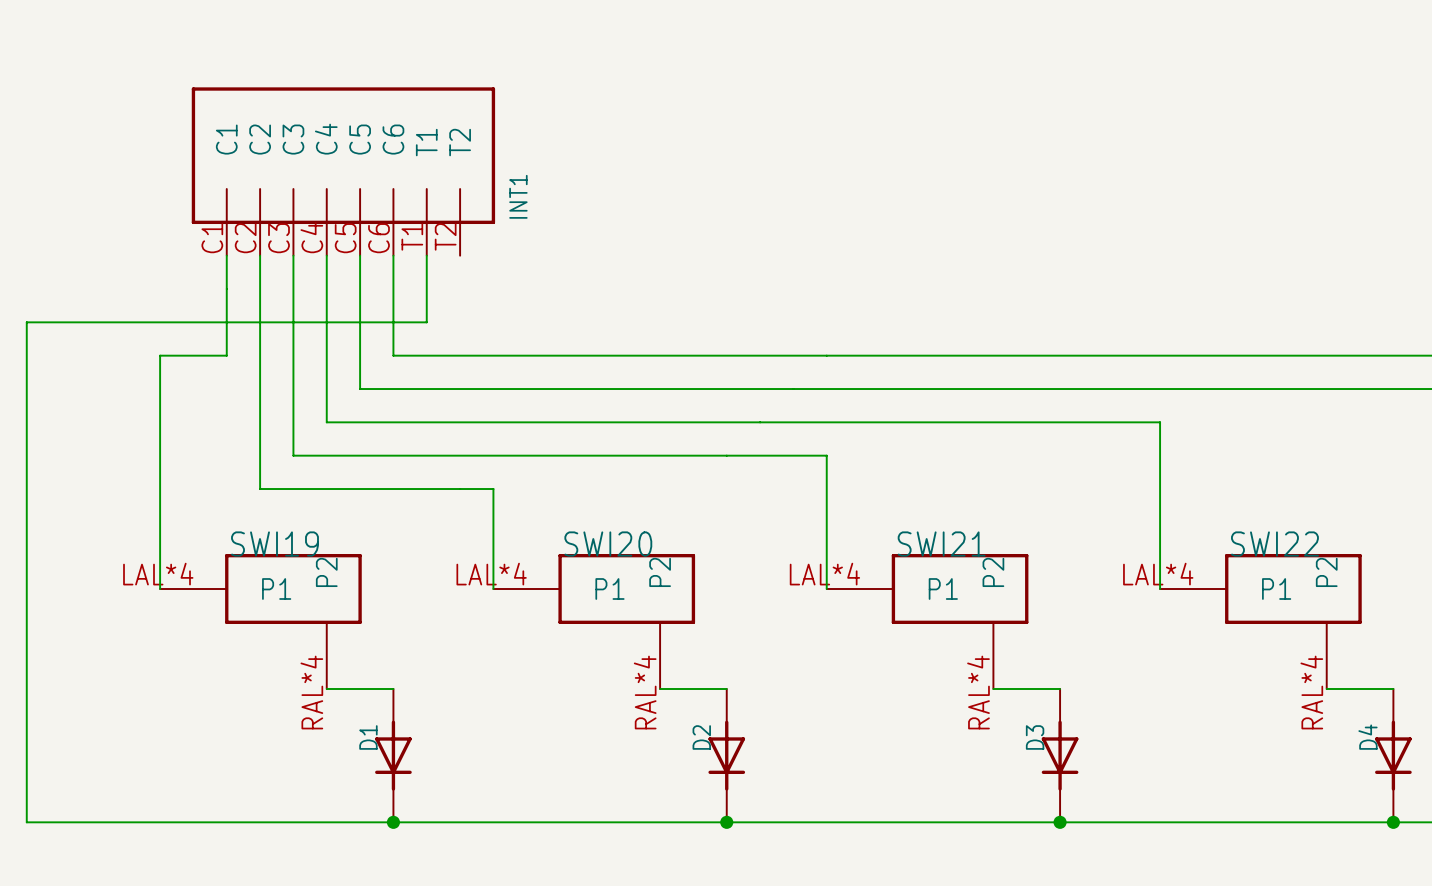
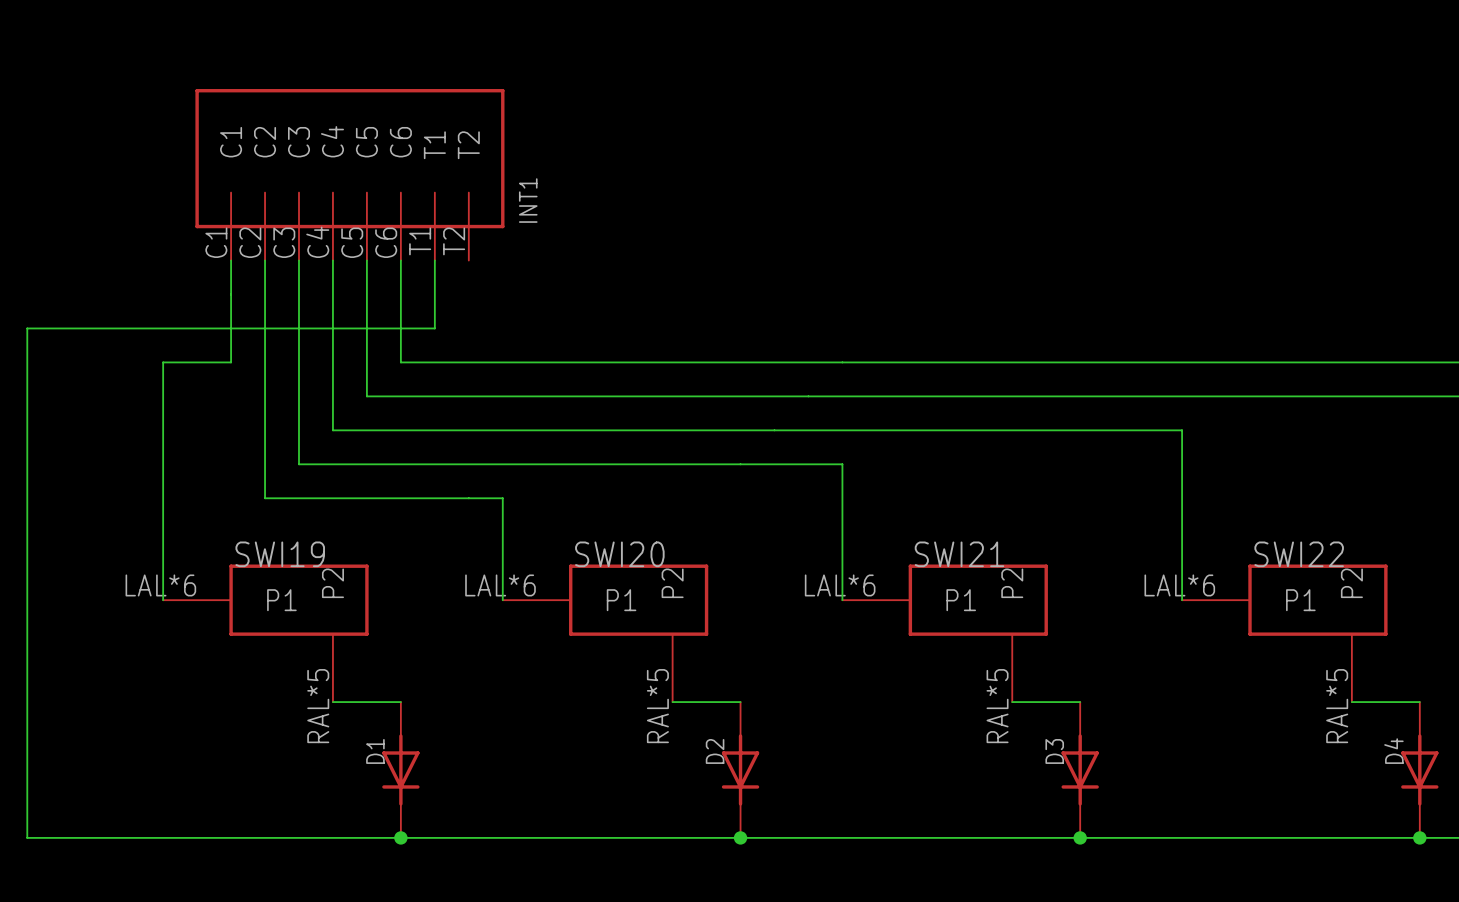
SWI19 pin number: LAL*4 (158, 574) -> LAL*6 (160, 585)
SWI20 pin number: LAL*4 (491, 574) -> LAL*6 (500, 585)
SWI21 pin number: LAL*4 (824, 574) -> LAL*6 (840, 585)
SWI22 pin number: LAL*4 (1158, 574) -> LAL*6 (1179, 585)
SWI19 pin number: RAL*4 (311, 692) -> RAL*5 (318, 706)
SWI20 pin number: RAL*4 (645, 692) -> RAL*5 (657, 706)
SWI21 pin number: RAL*4 (978, 692) -> RAL*5 (997, 706)
SWI22 pin number: RAL*4 (1311, 692) -> RAL*5 (1337, 706)

